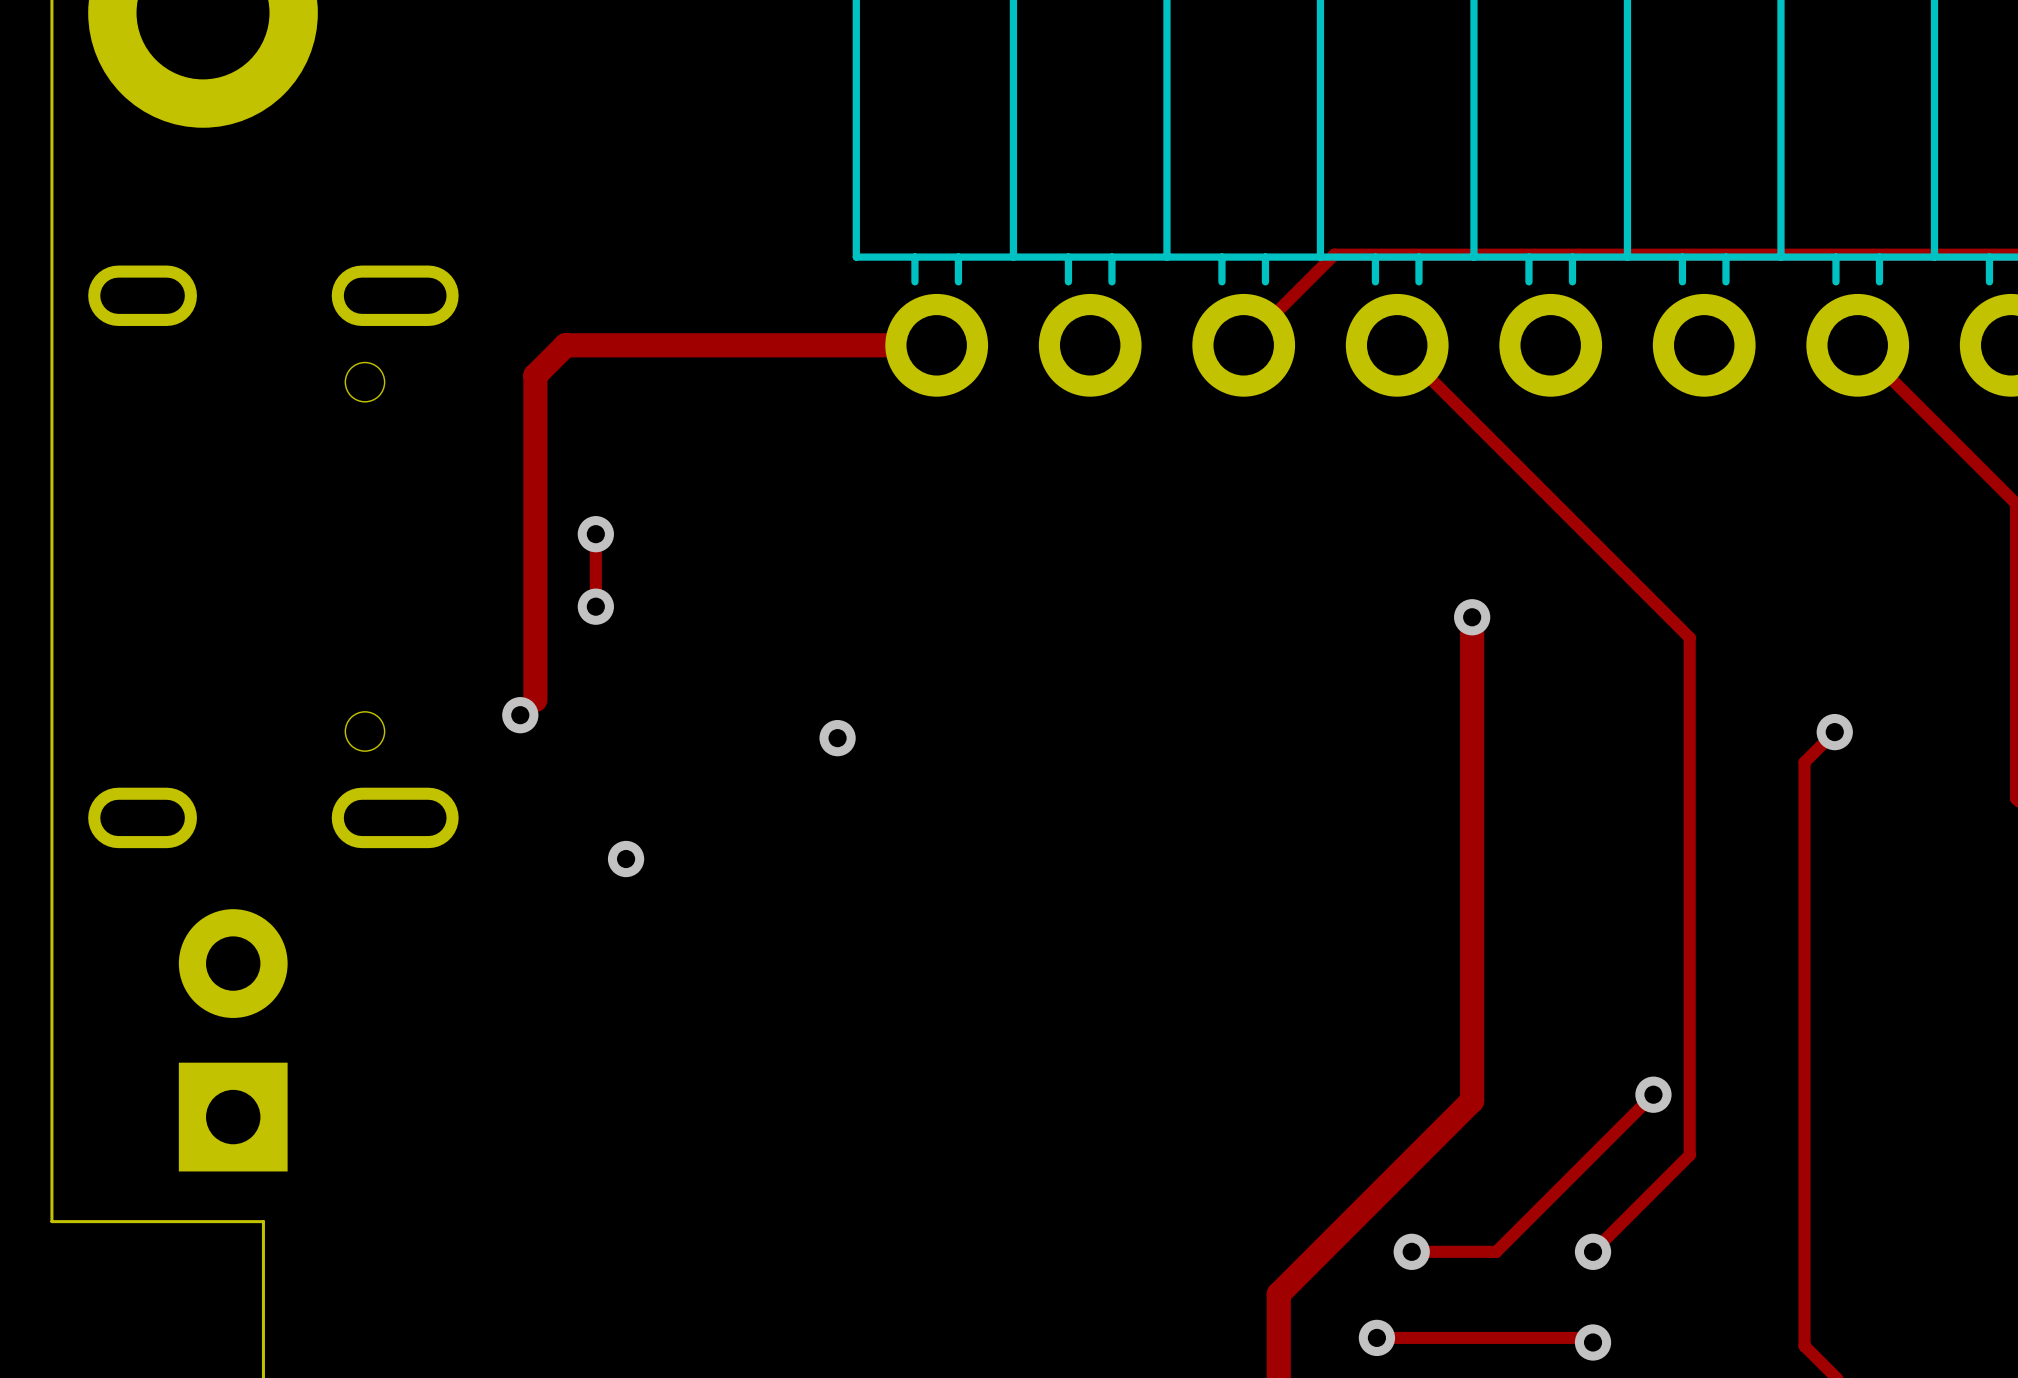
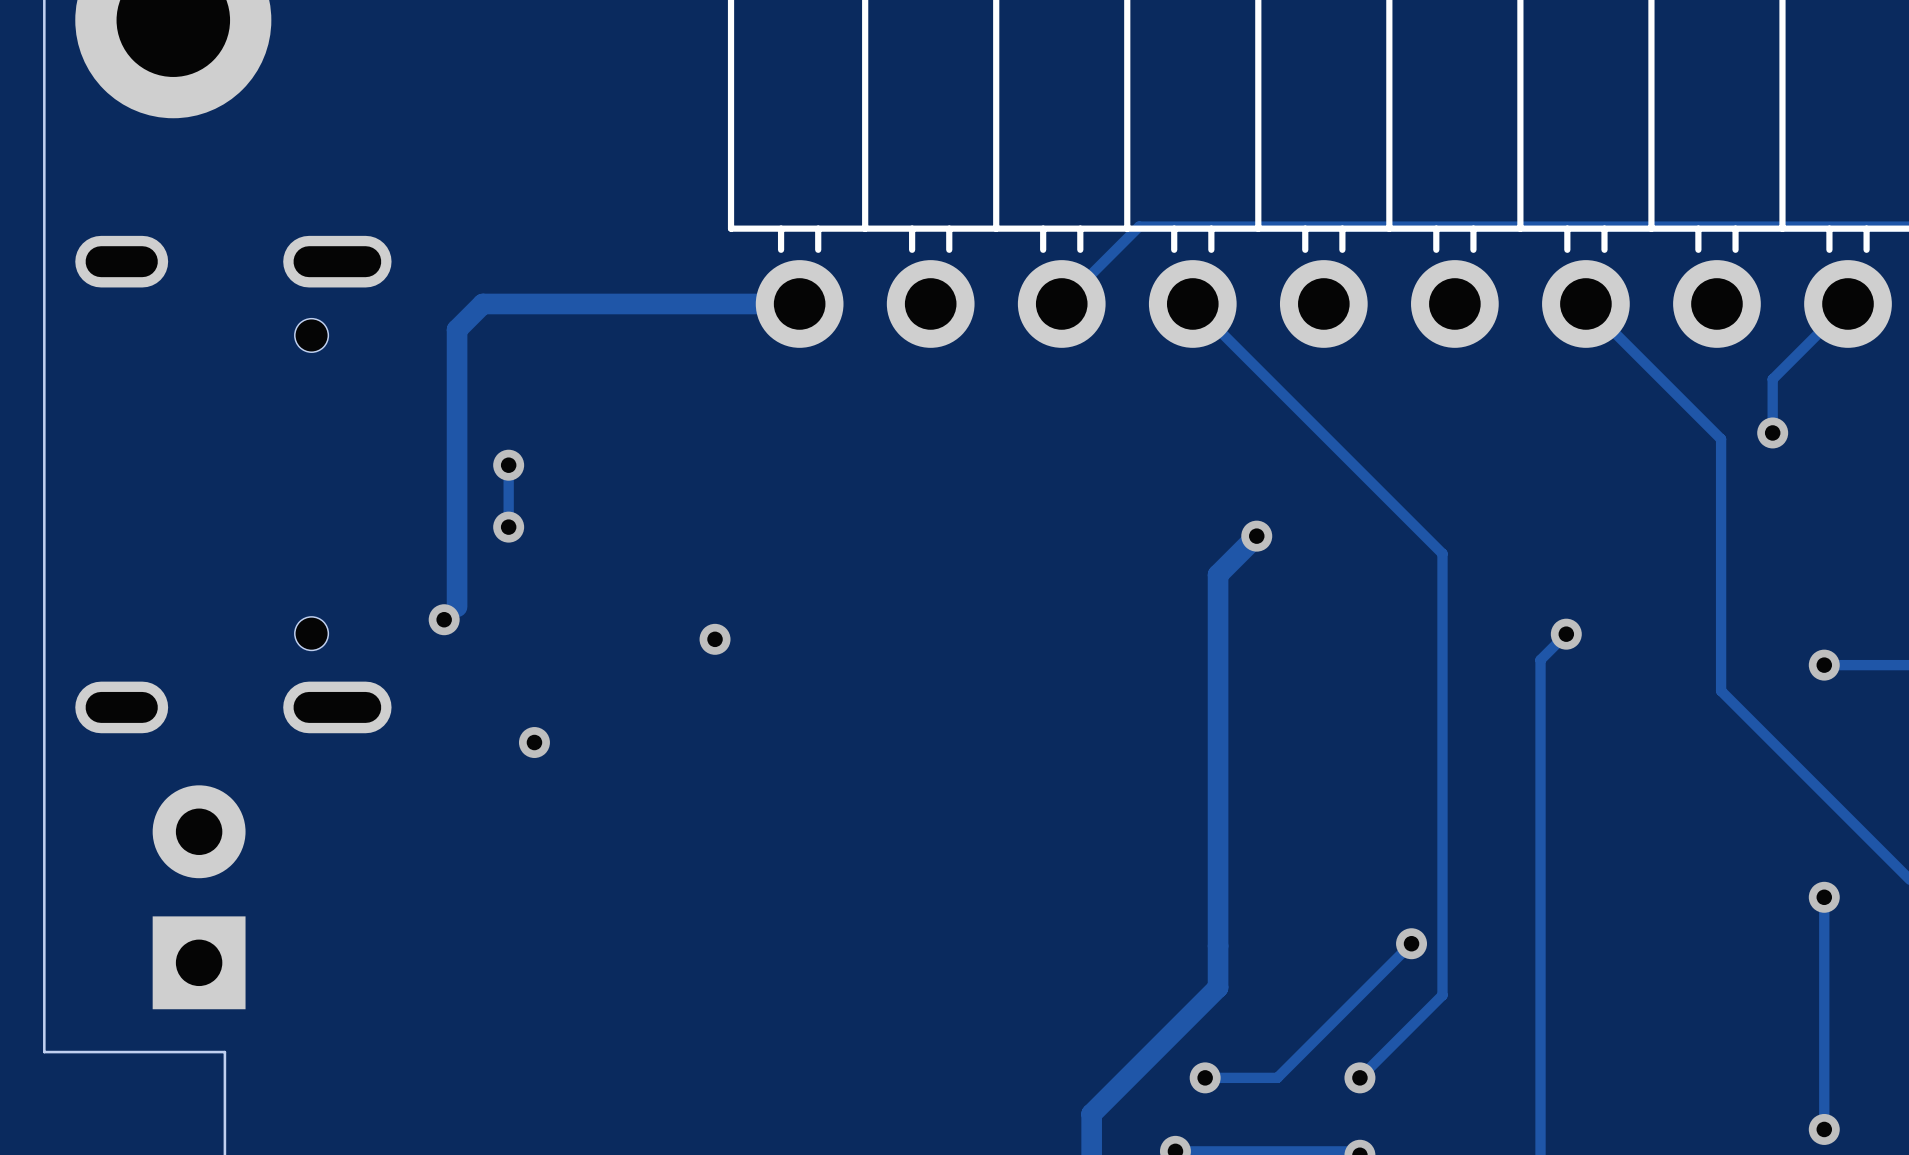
track: (1472, 617) (1472, 1100) (1426, 1146) -> (1256, 536) (1218, 574) (1218, 987)

